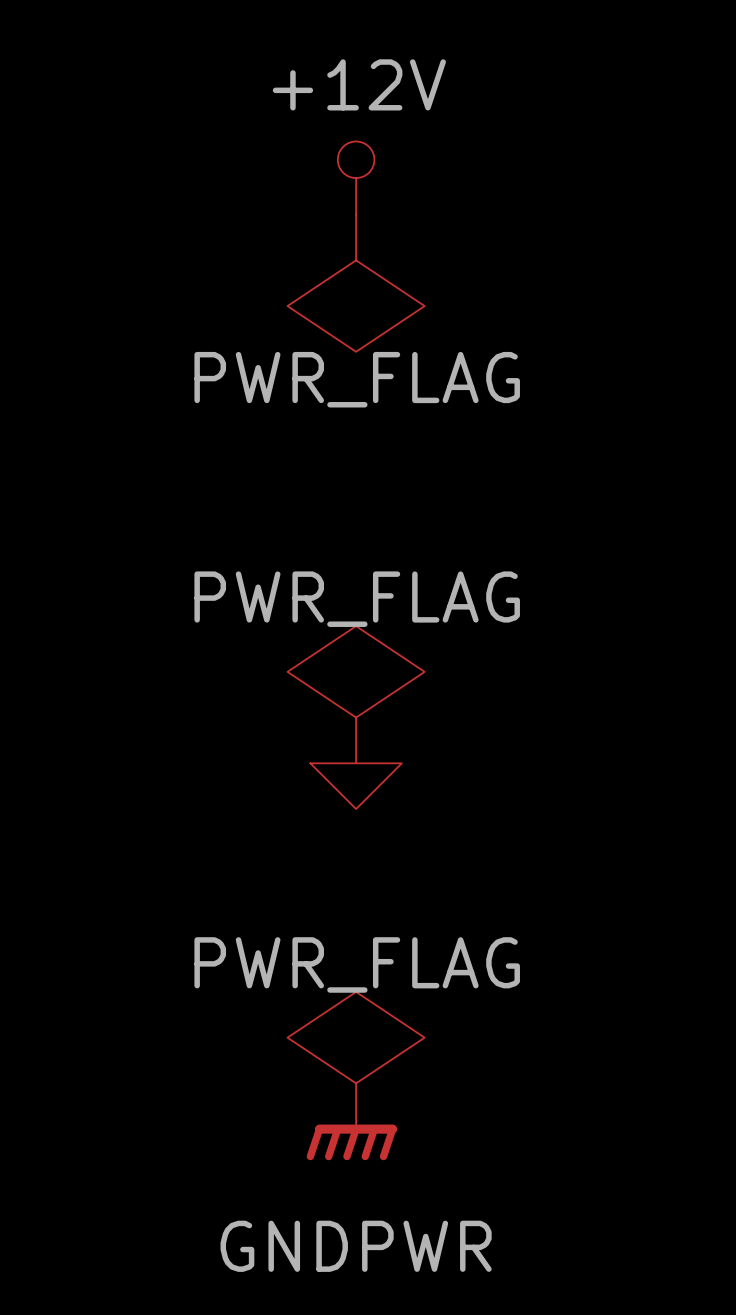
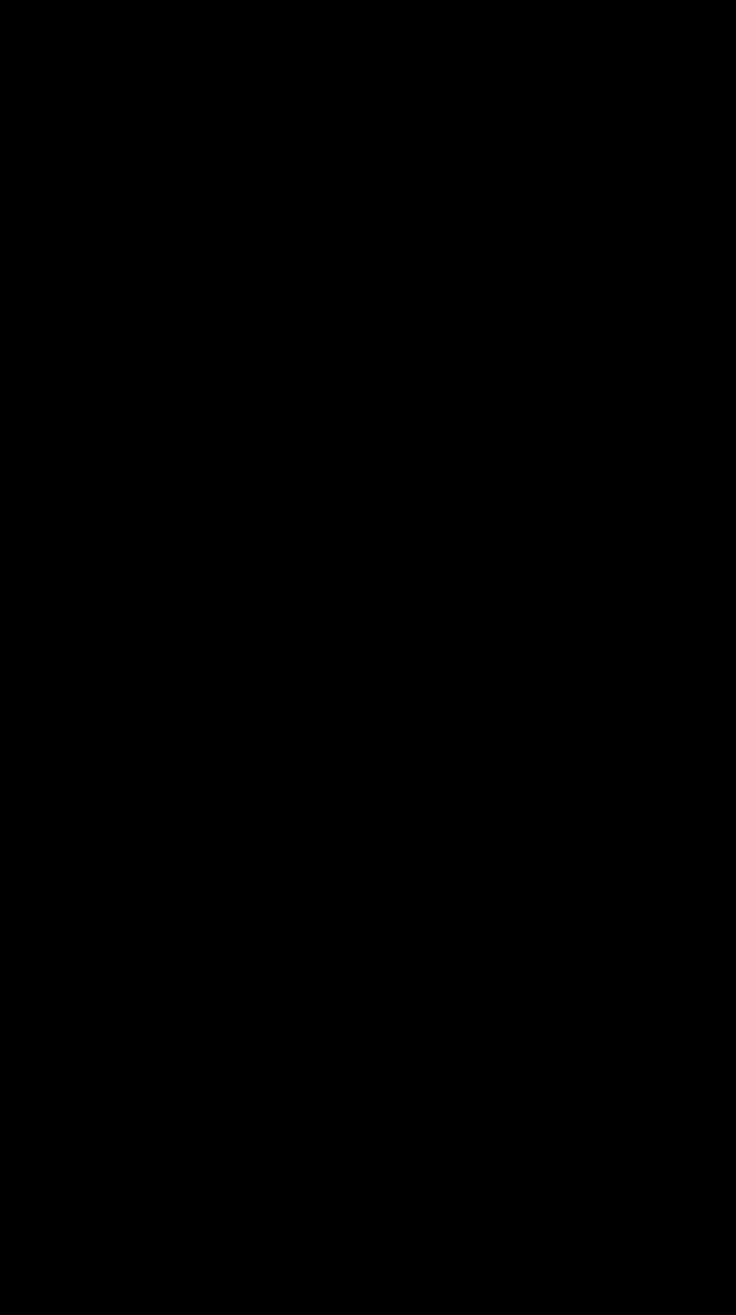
power symbol: +12V (356, 178) -> none
power symbol: PWR_FLAG (356, 283) -> none
power symbol: PWR_FLAG (356, 694) -> none
power symbol: (356, 786) -> none
power symbol: PWR_FLAG (356, 1060) -> none
power symbol: GNDPWR (351, 1142) -> none

